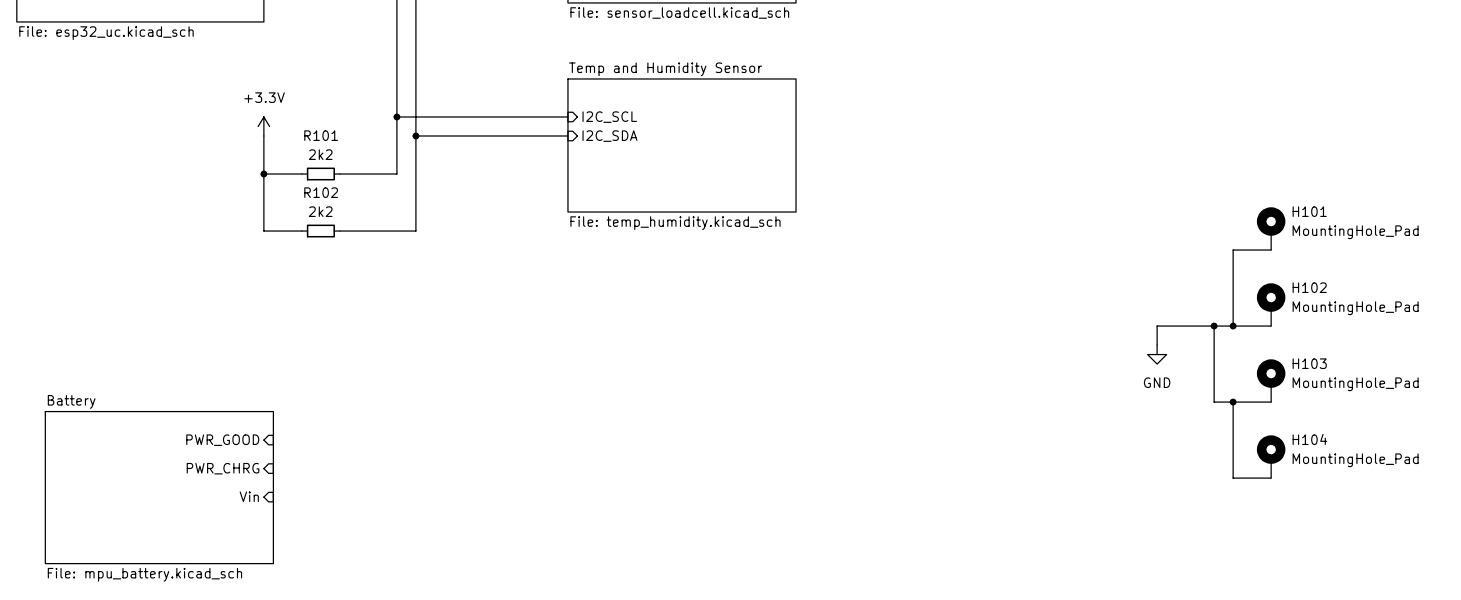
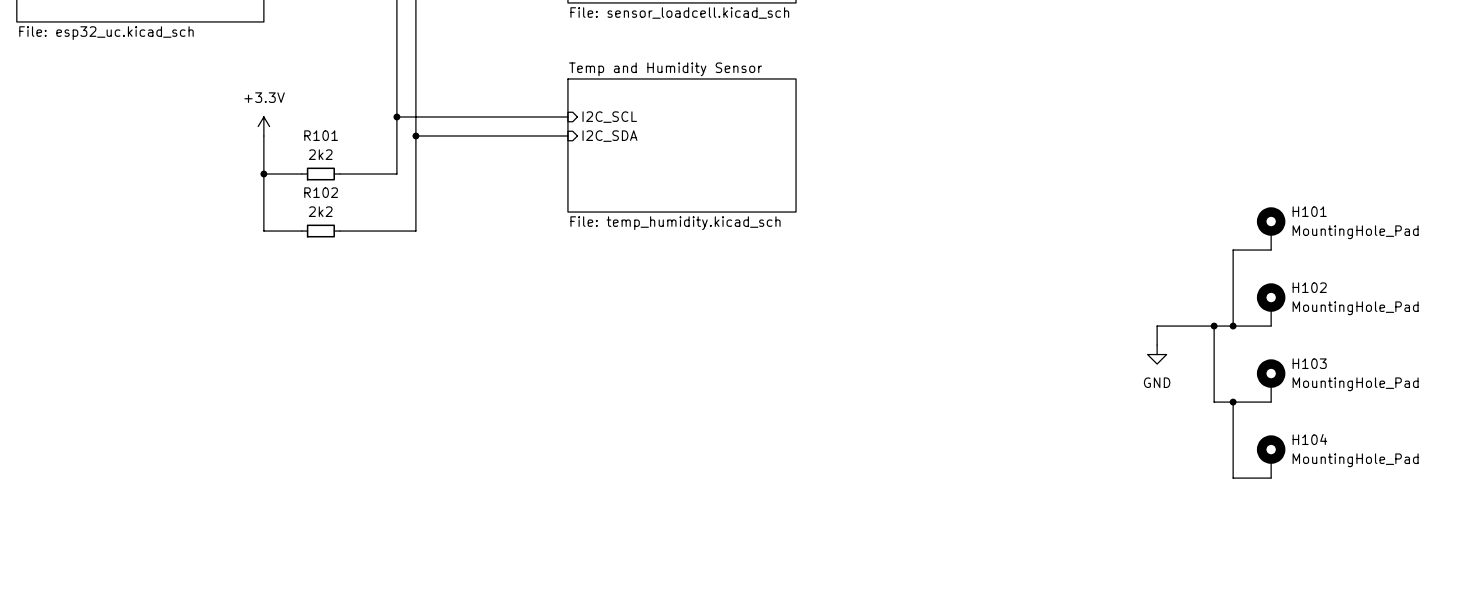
sheet pin: PWR_GOOD (222, 440) -> none
sheet pin: PWR_CHRG (223, 468) -> none
sheet Battery: File: mpu_battery.kicad_sch (159, 487) -> none
sheet pin: Vin (249, 496) -> none

